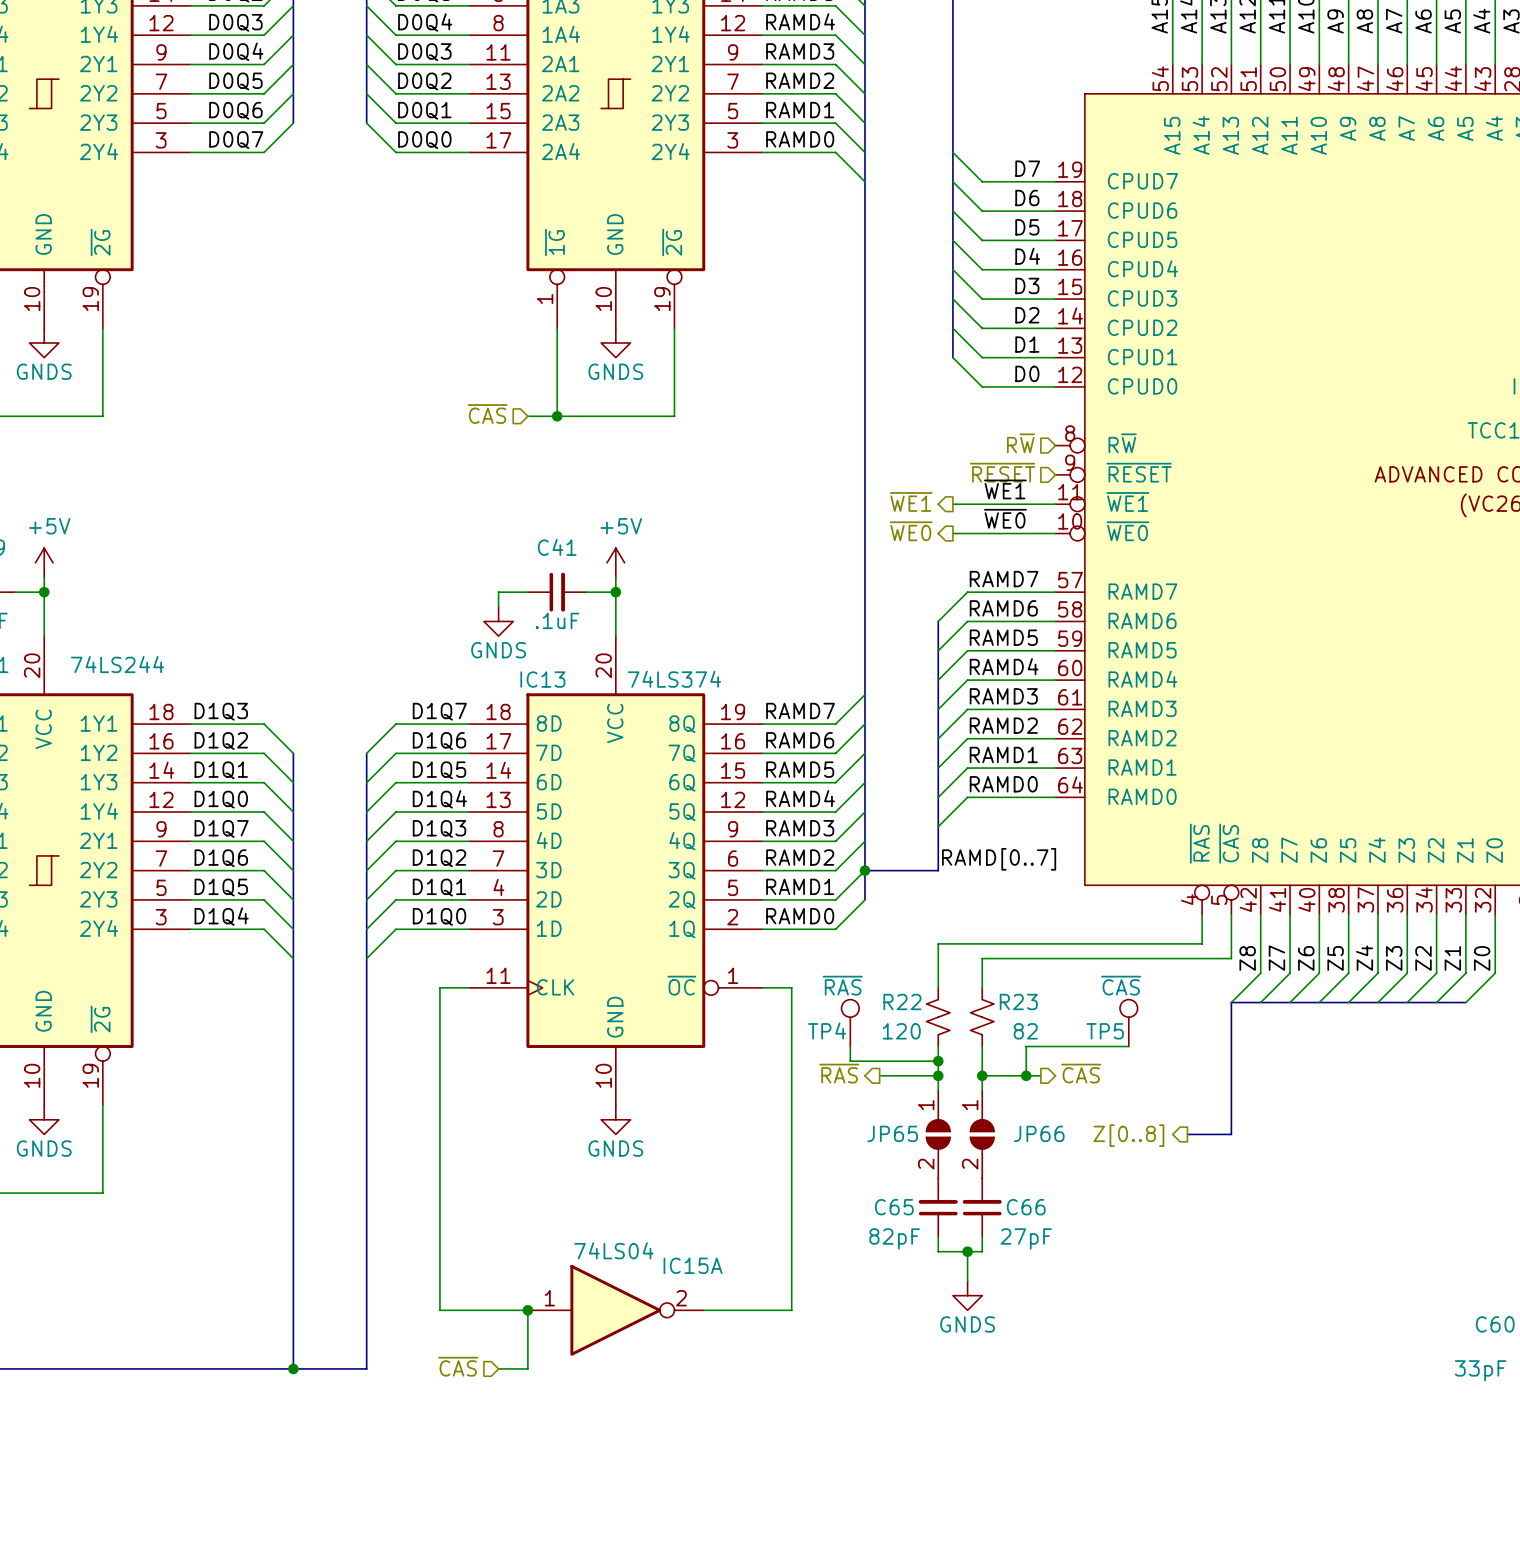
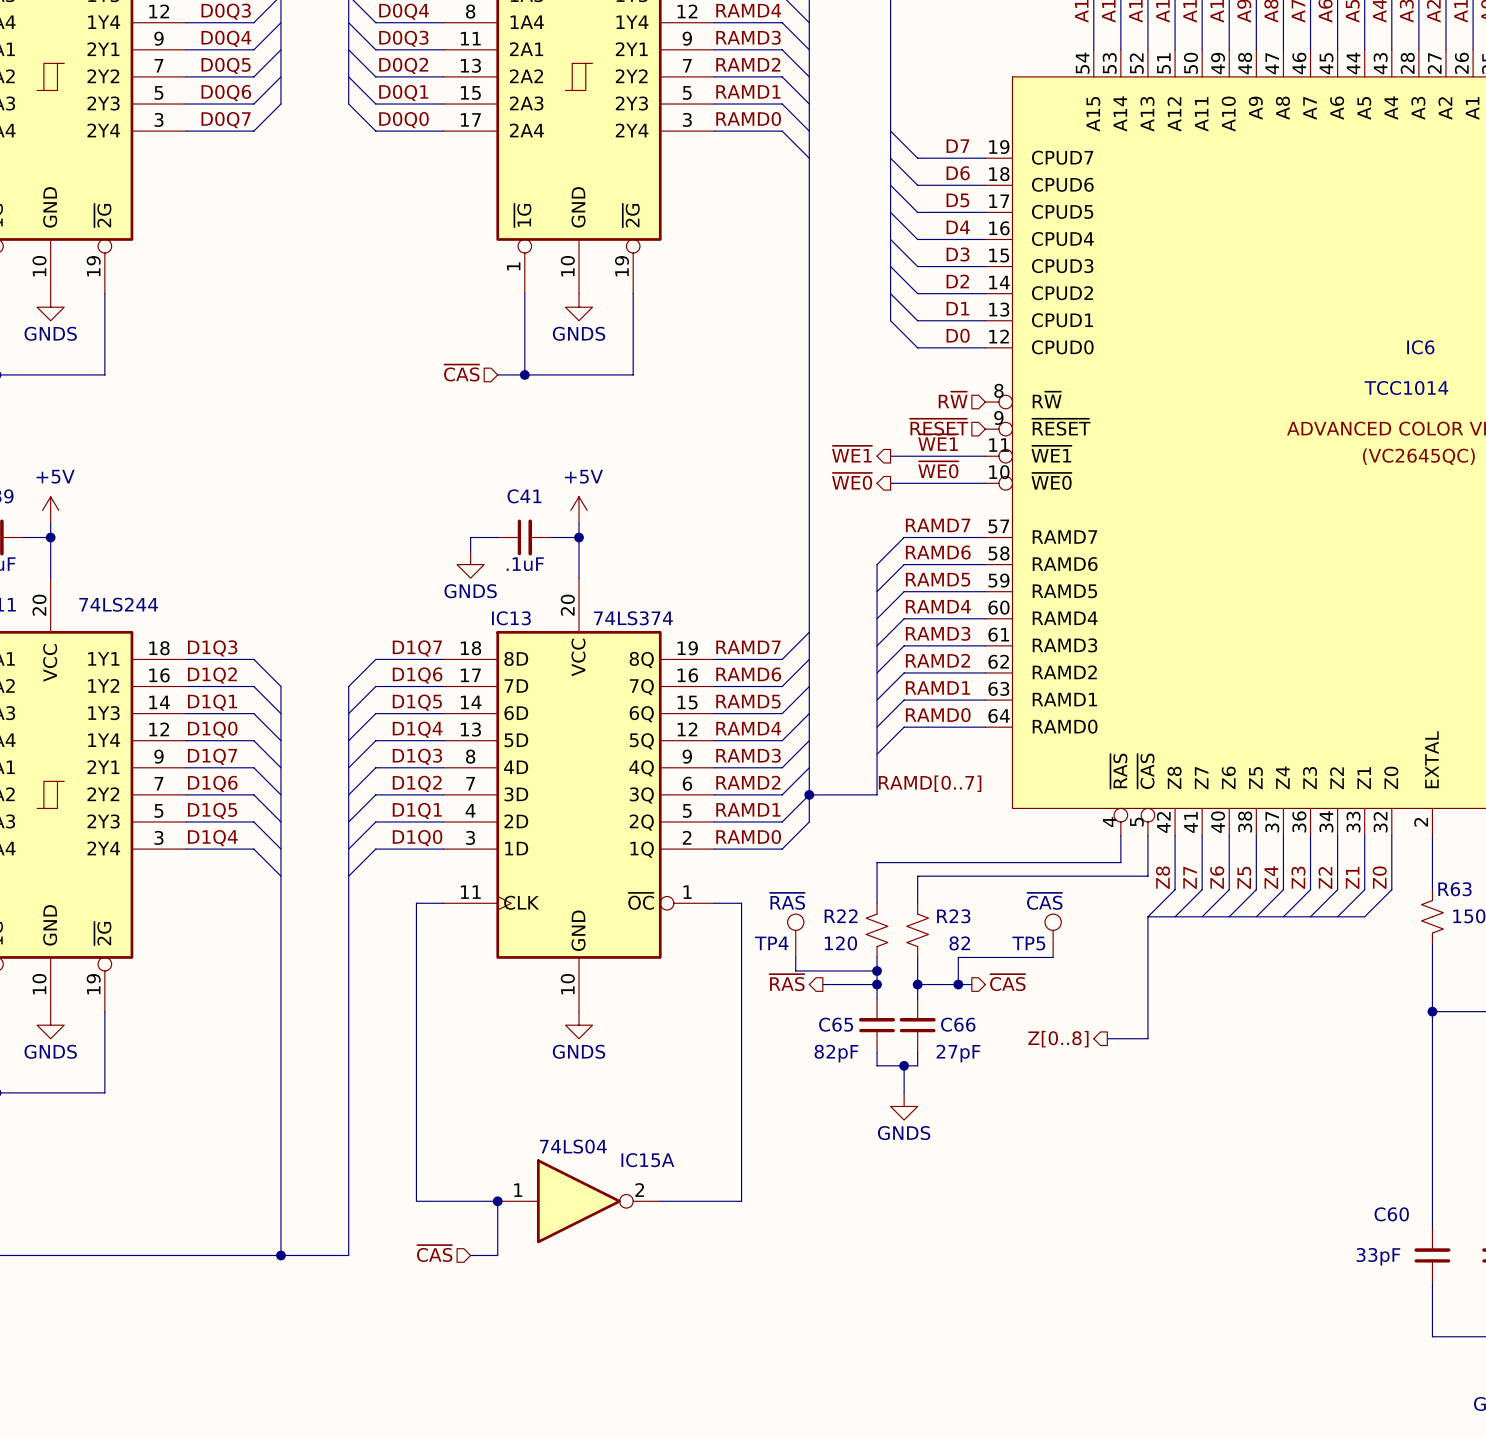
JP65: (938, 1134) -> none
JP66: (982, 1134) -> none
junction: none -> (904, 1065)
C65 position: (938, 1207) -> (877, 1025)
C66 position: (982, 1207) -> (917, 1025)
wire: (938, 1237) (938, 1251) (982, 1251) (982, 1237) -> (877, 1052) (877, 1065) (917, 1065) (917, 1052)
wire: (967, 1251) (967, 1281) -> (904, 1065) (904, 1092)
junction: (967, 1251) -> none
power symbol position: GNDS (967, 1295) -> GNDS (904, 1106)

